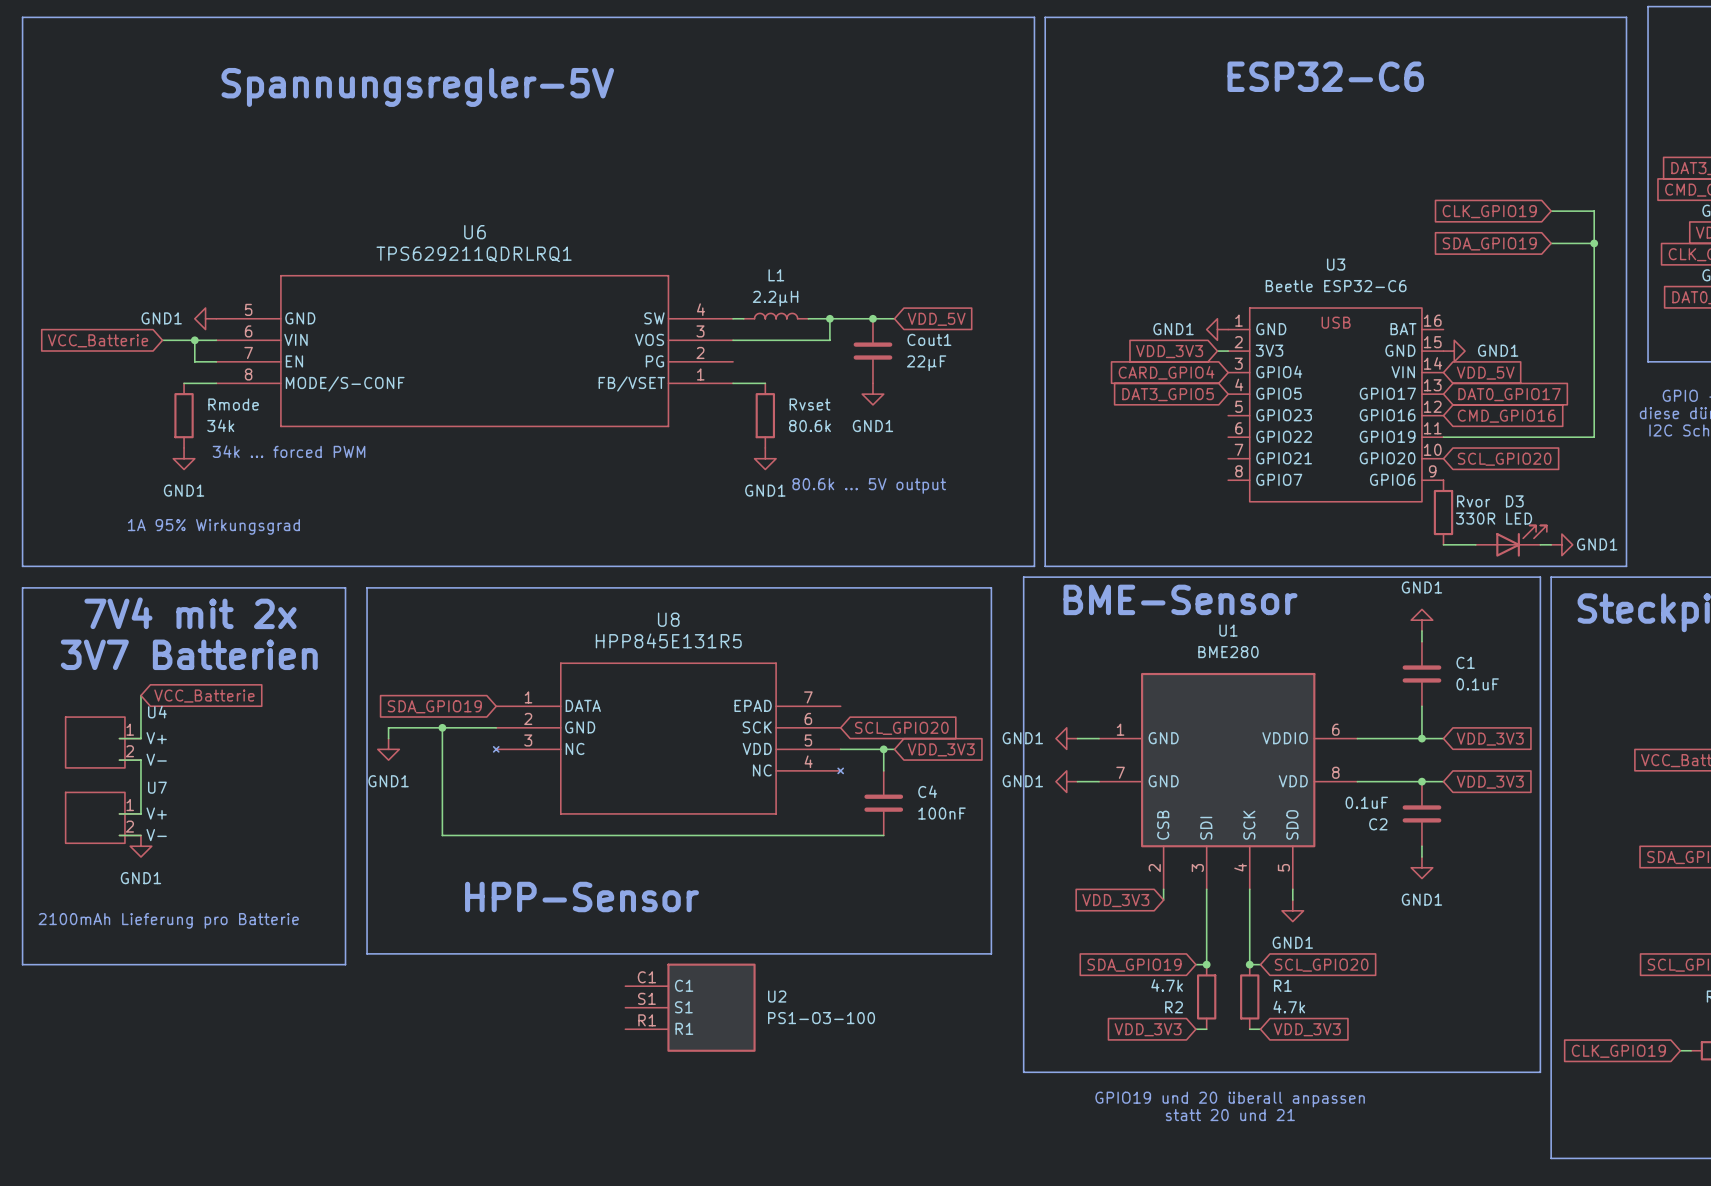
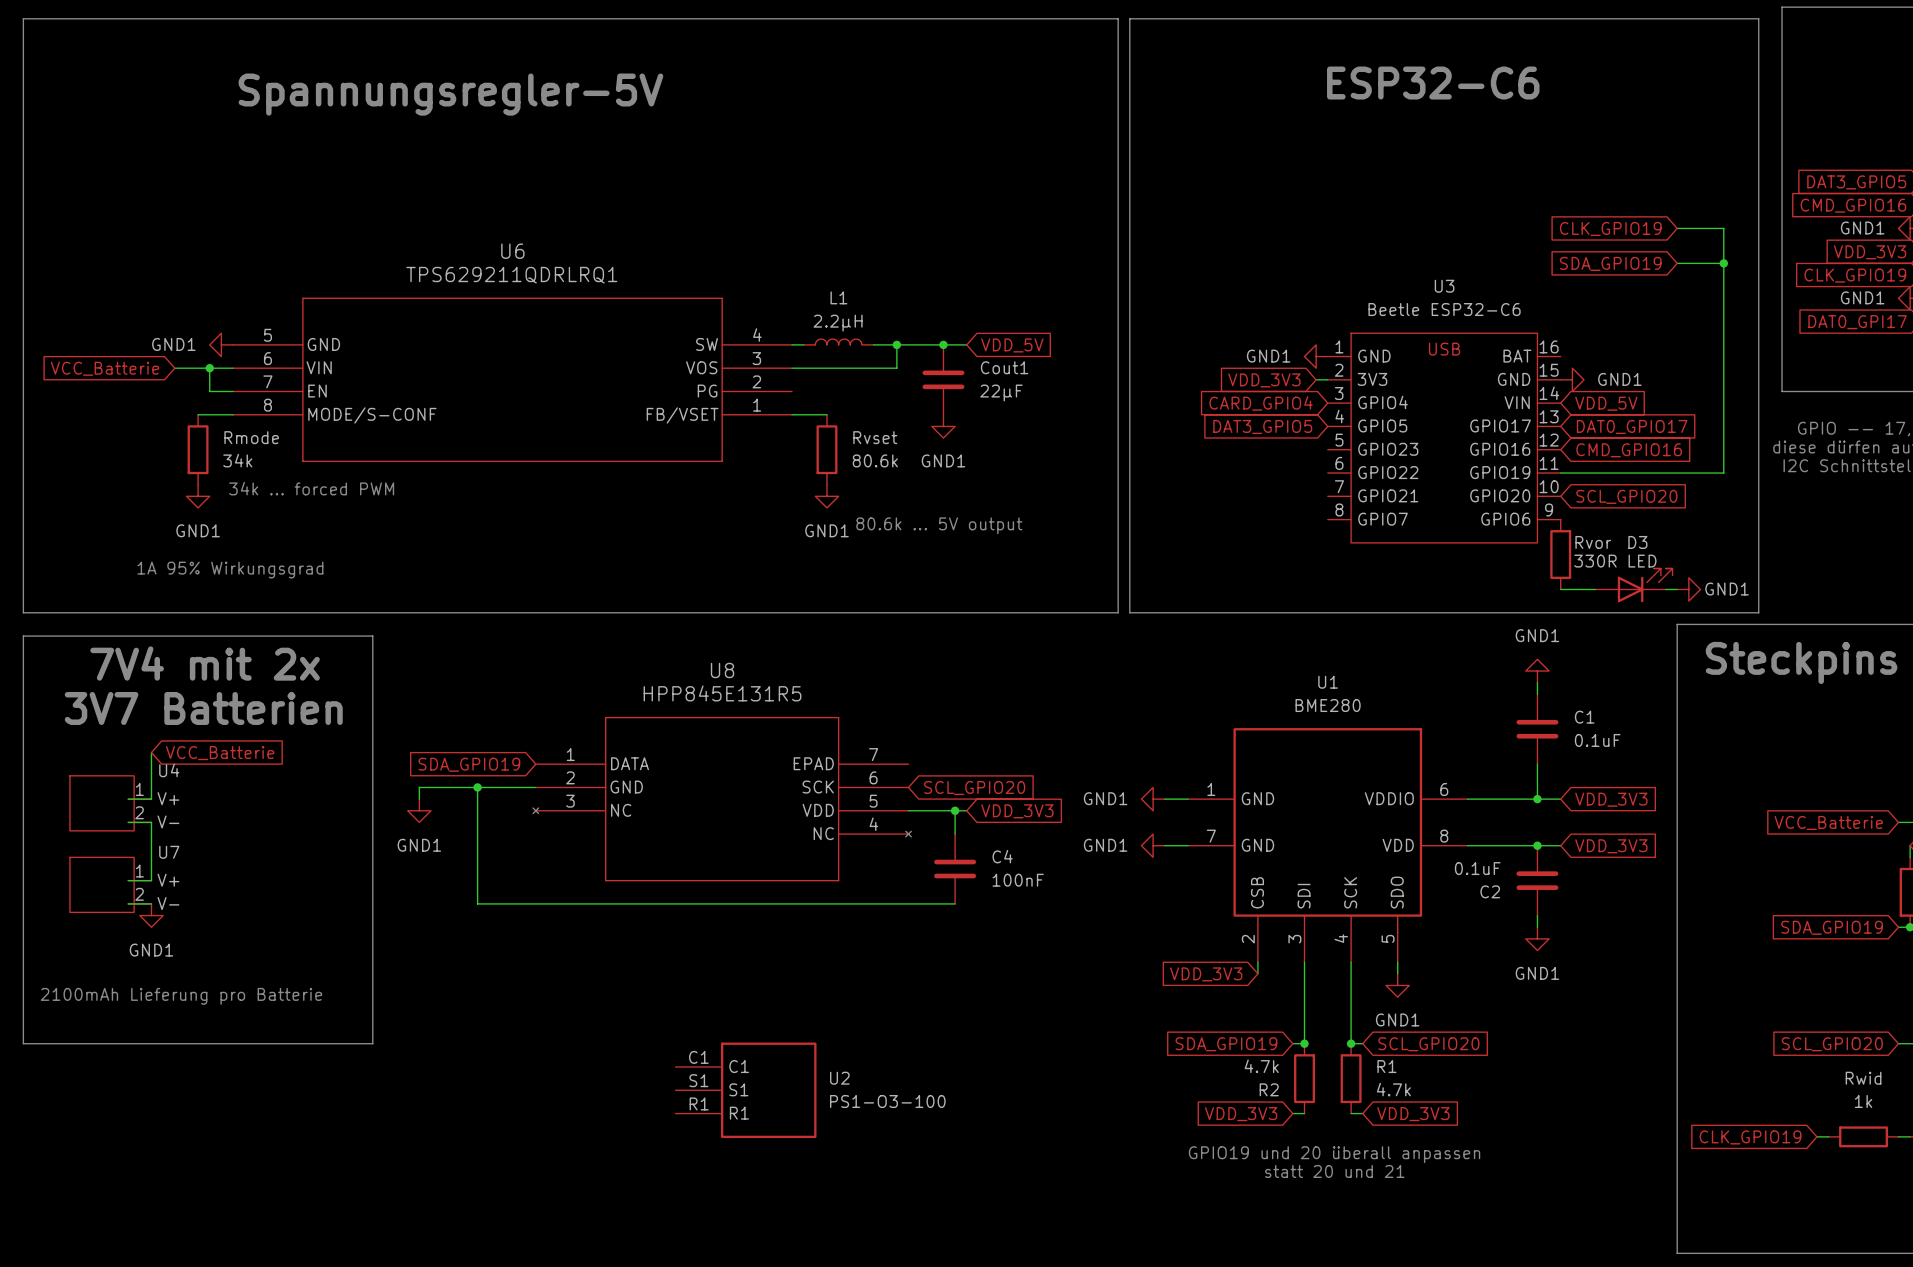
line: (1023, 577) (1540, 577) (1540, 1072) (1023, 1072) (1023, 577) -> none
line: (367, 587) (991, 587) (991, 953) (367, 953) (367, 587) -> none
text: BME-Sensor (1180, 599) -> none
text: HPP-Sensor (581, 896) -> none
text position: GPIO19 und 20 überall anpassen (1230, 1099) -> GPIO19 und 20 überall anpassen (1334, 1154)
text position: statt 20 und 21 (1230, 1115) -> statt 20 und 21 (1334, 1171)

